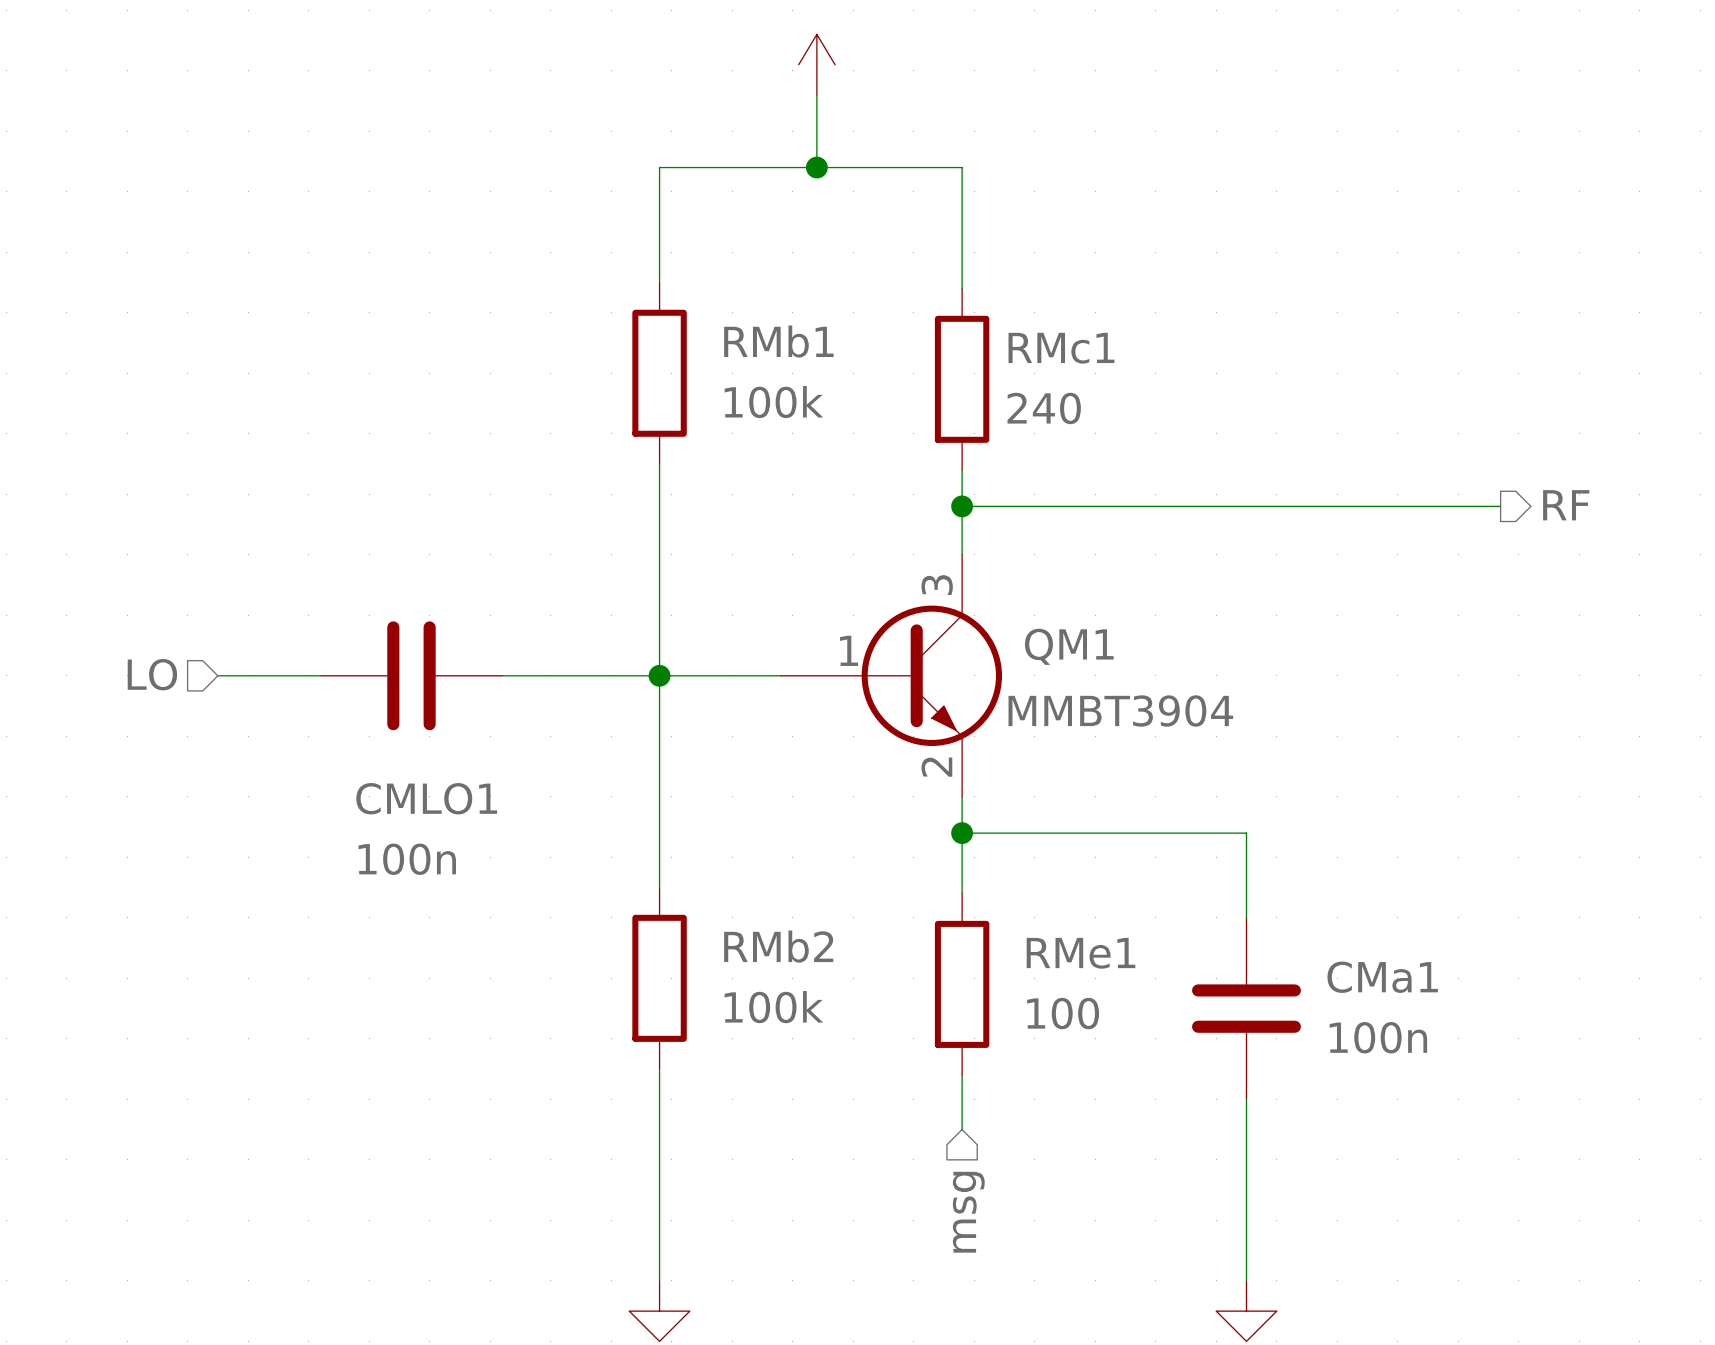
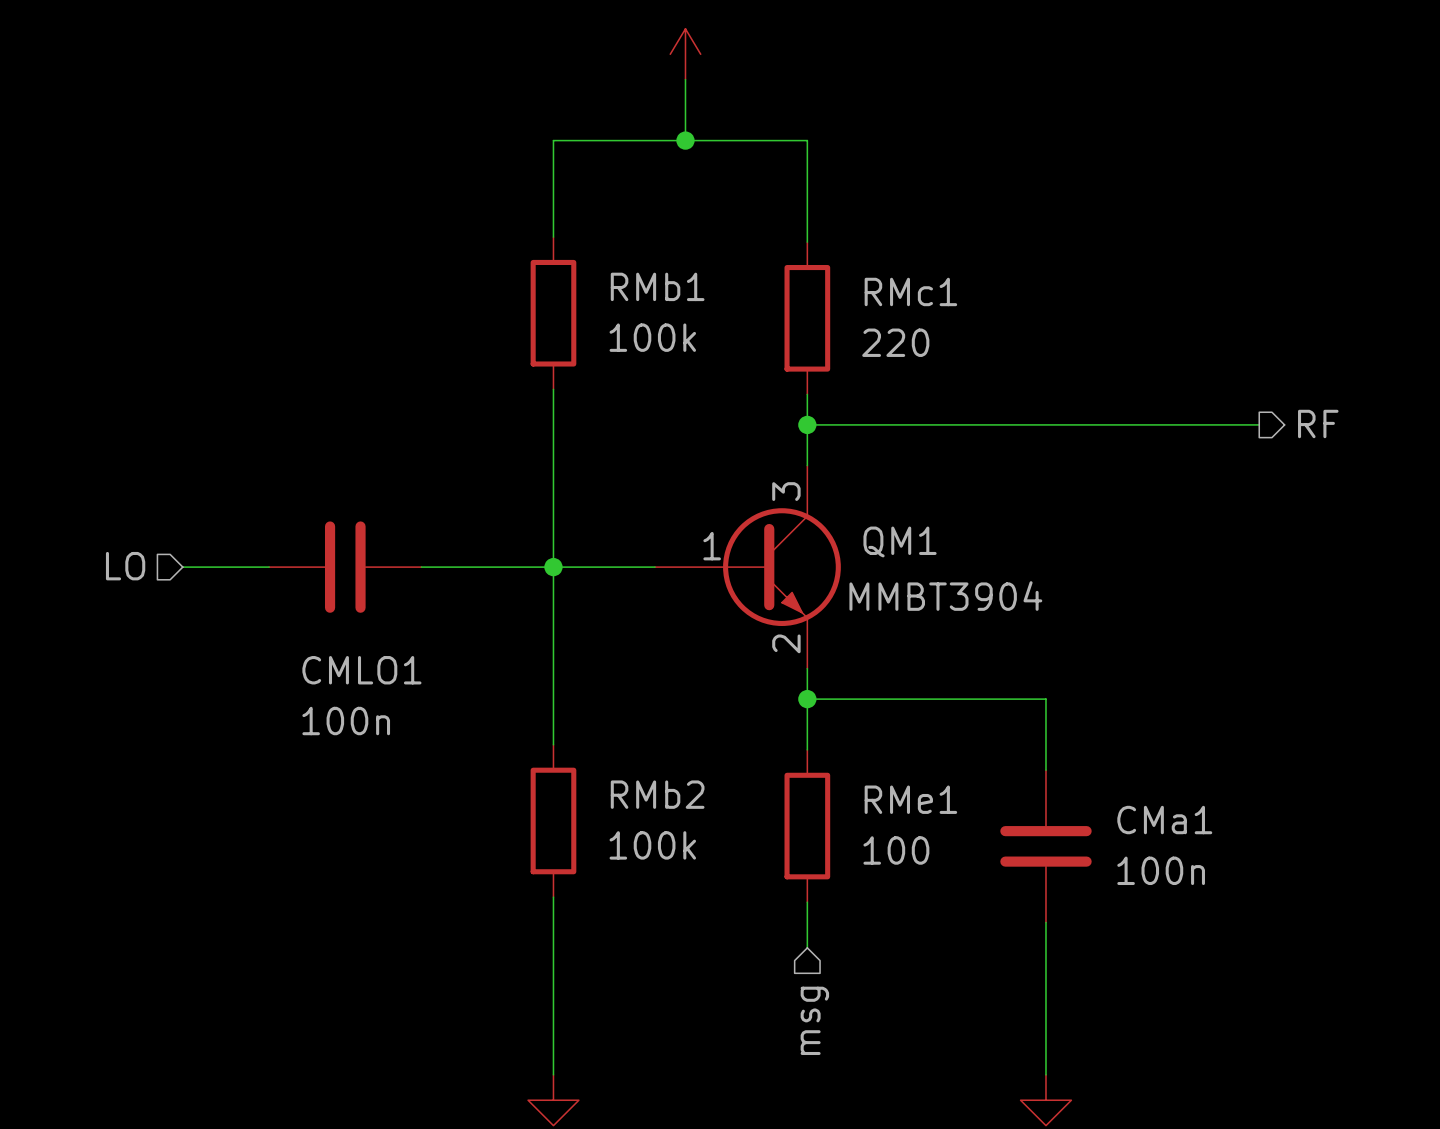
RMc1 name position: RMc1 (1061, 348) -> RMc1 (910, 291)
RMc1 value: 240 (1044, 408) -> 220 (895, 342)

